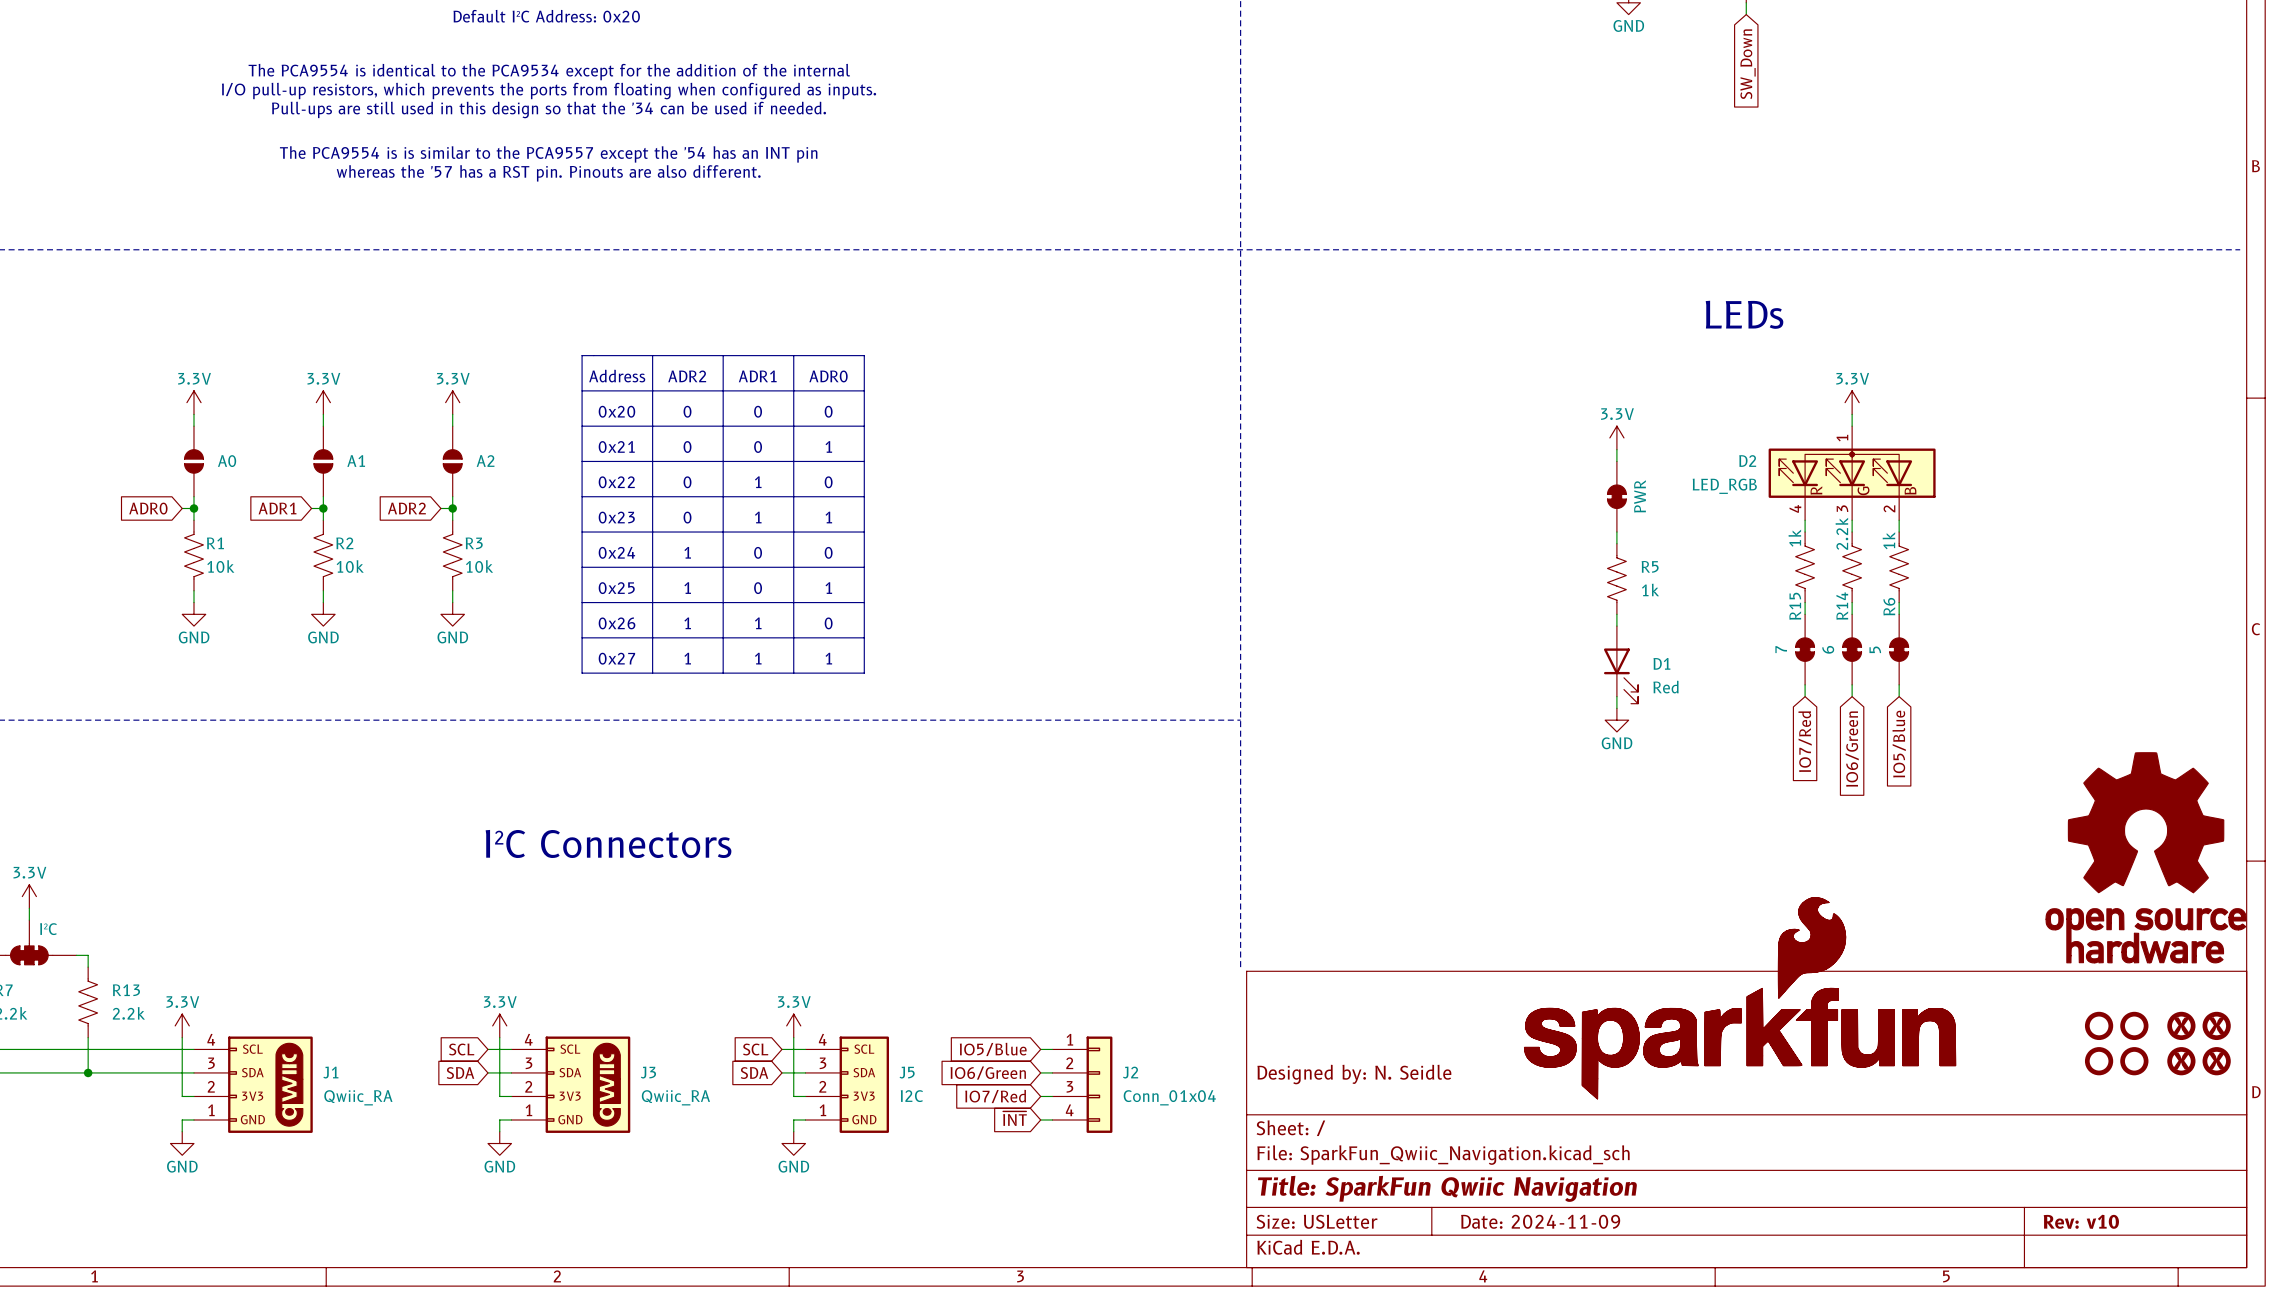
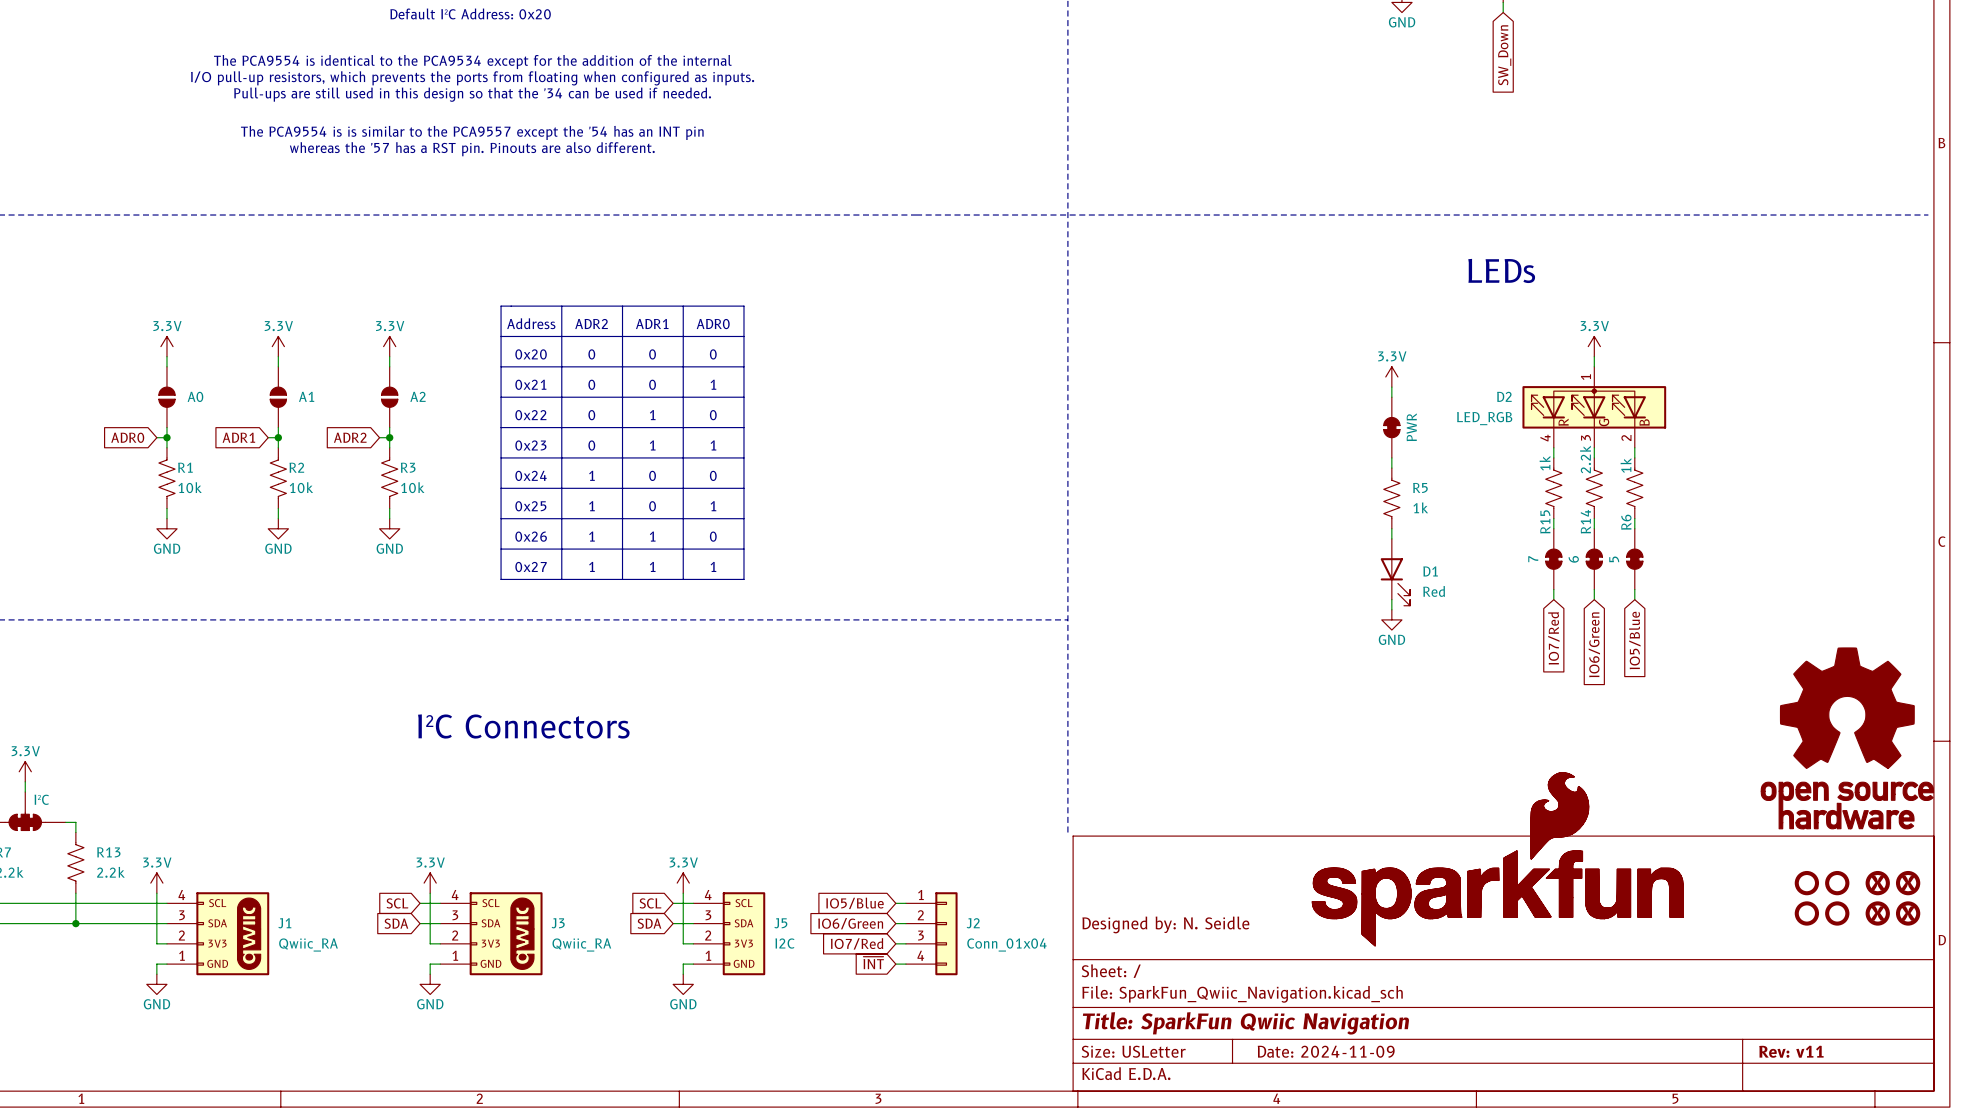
title block: Rev: v10 (2081, 1221) -> Rev: v11 (1791, 1051)

